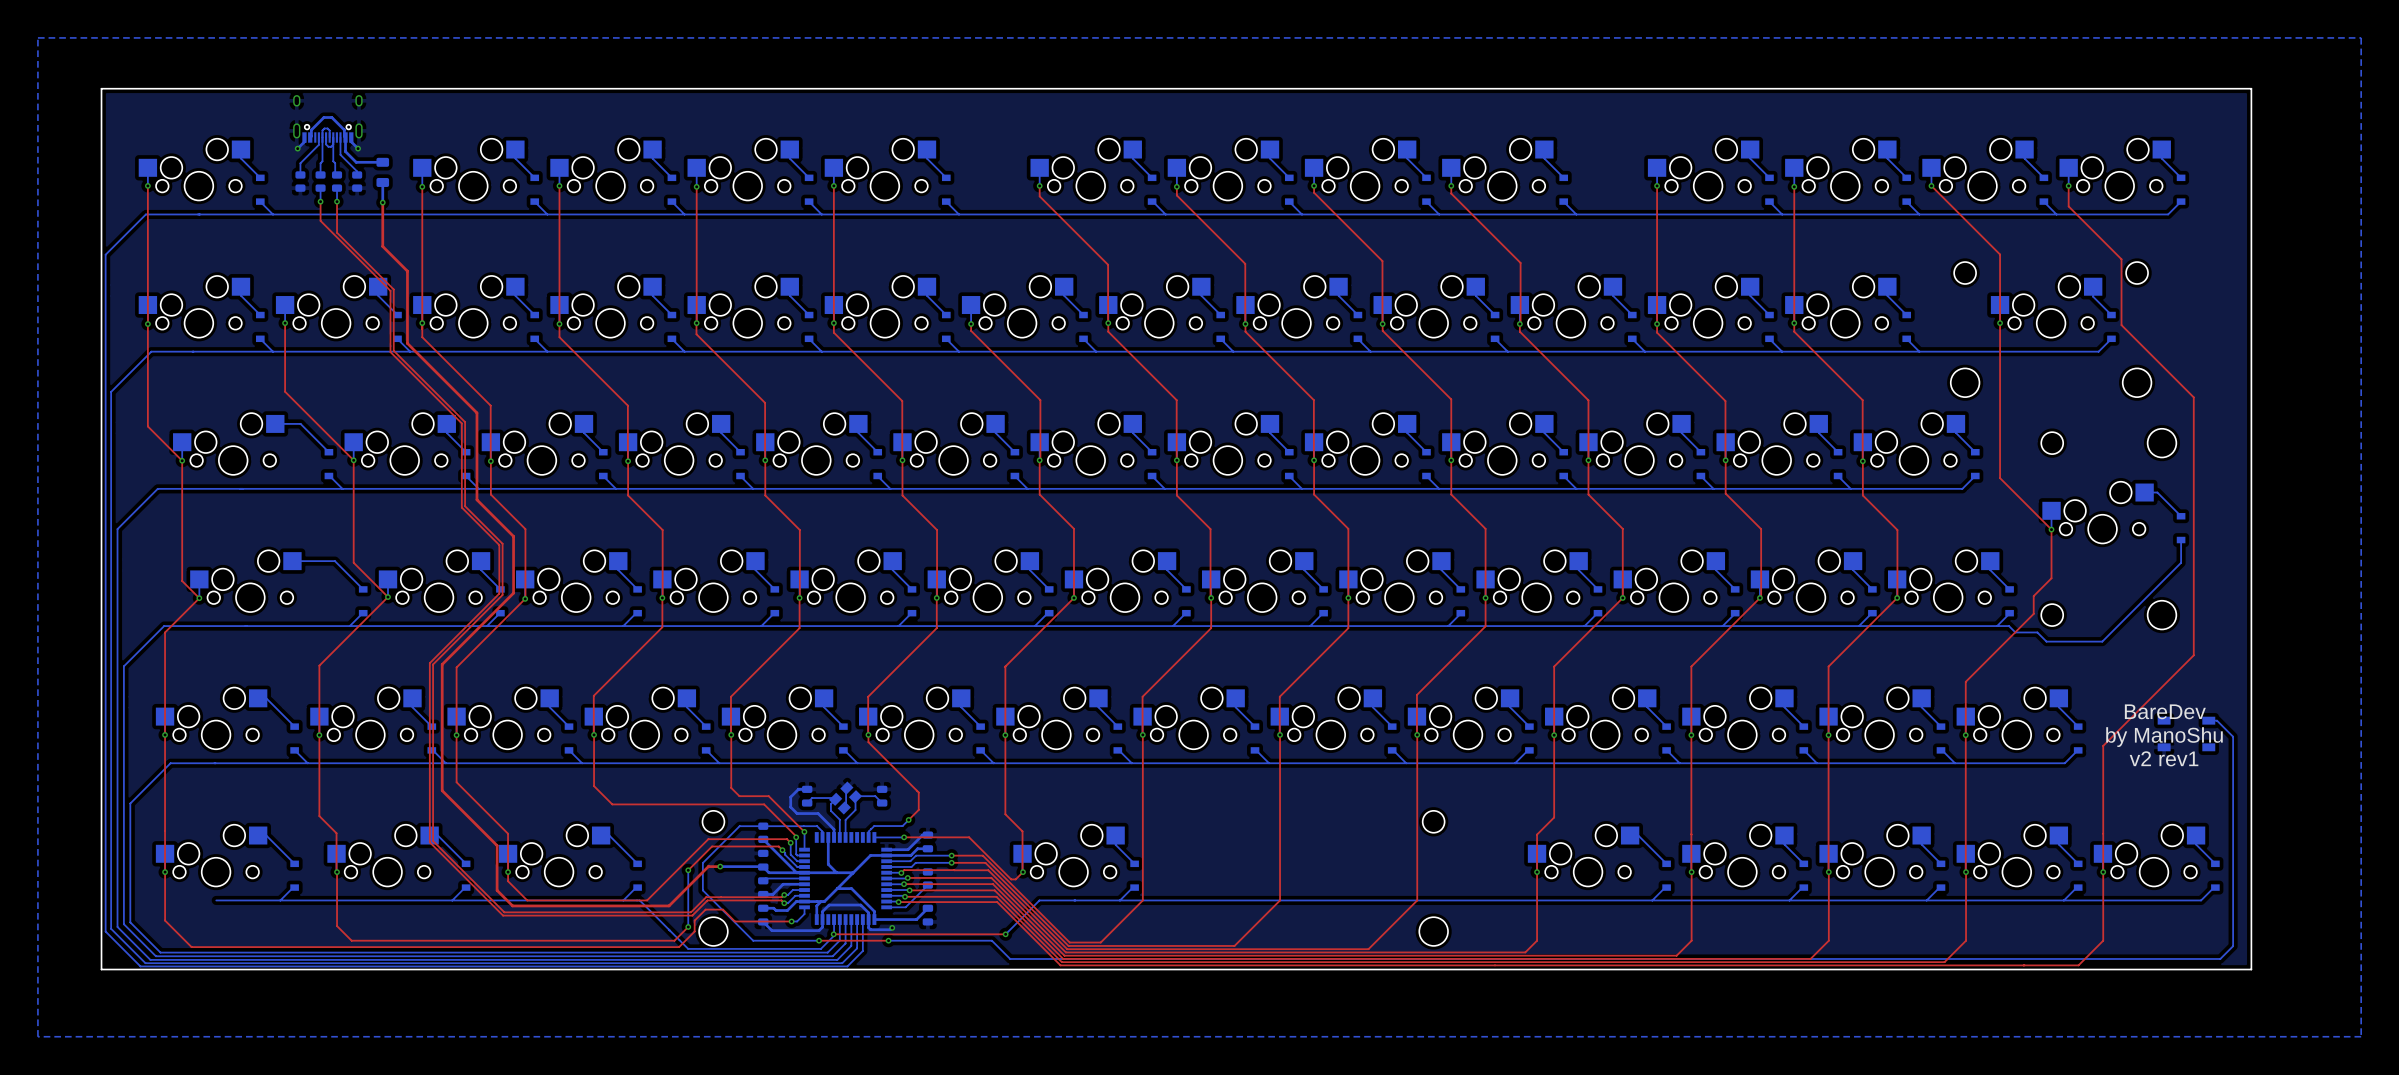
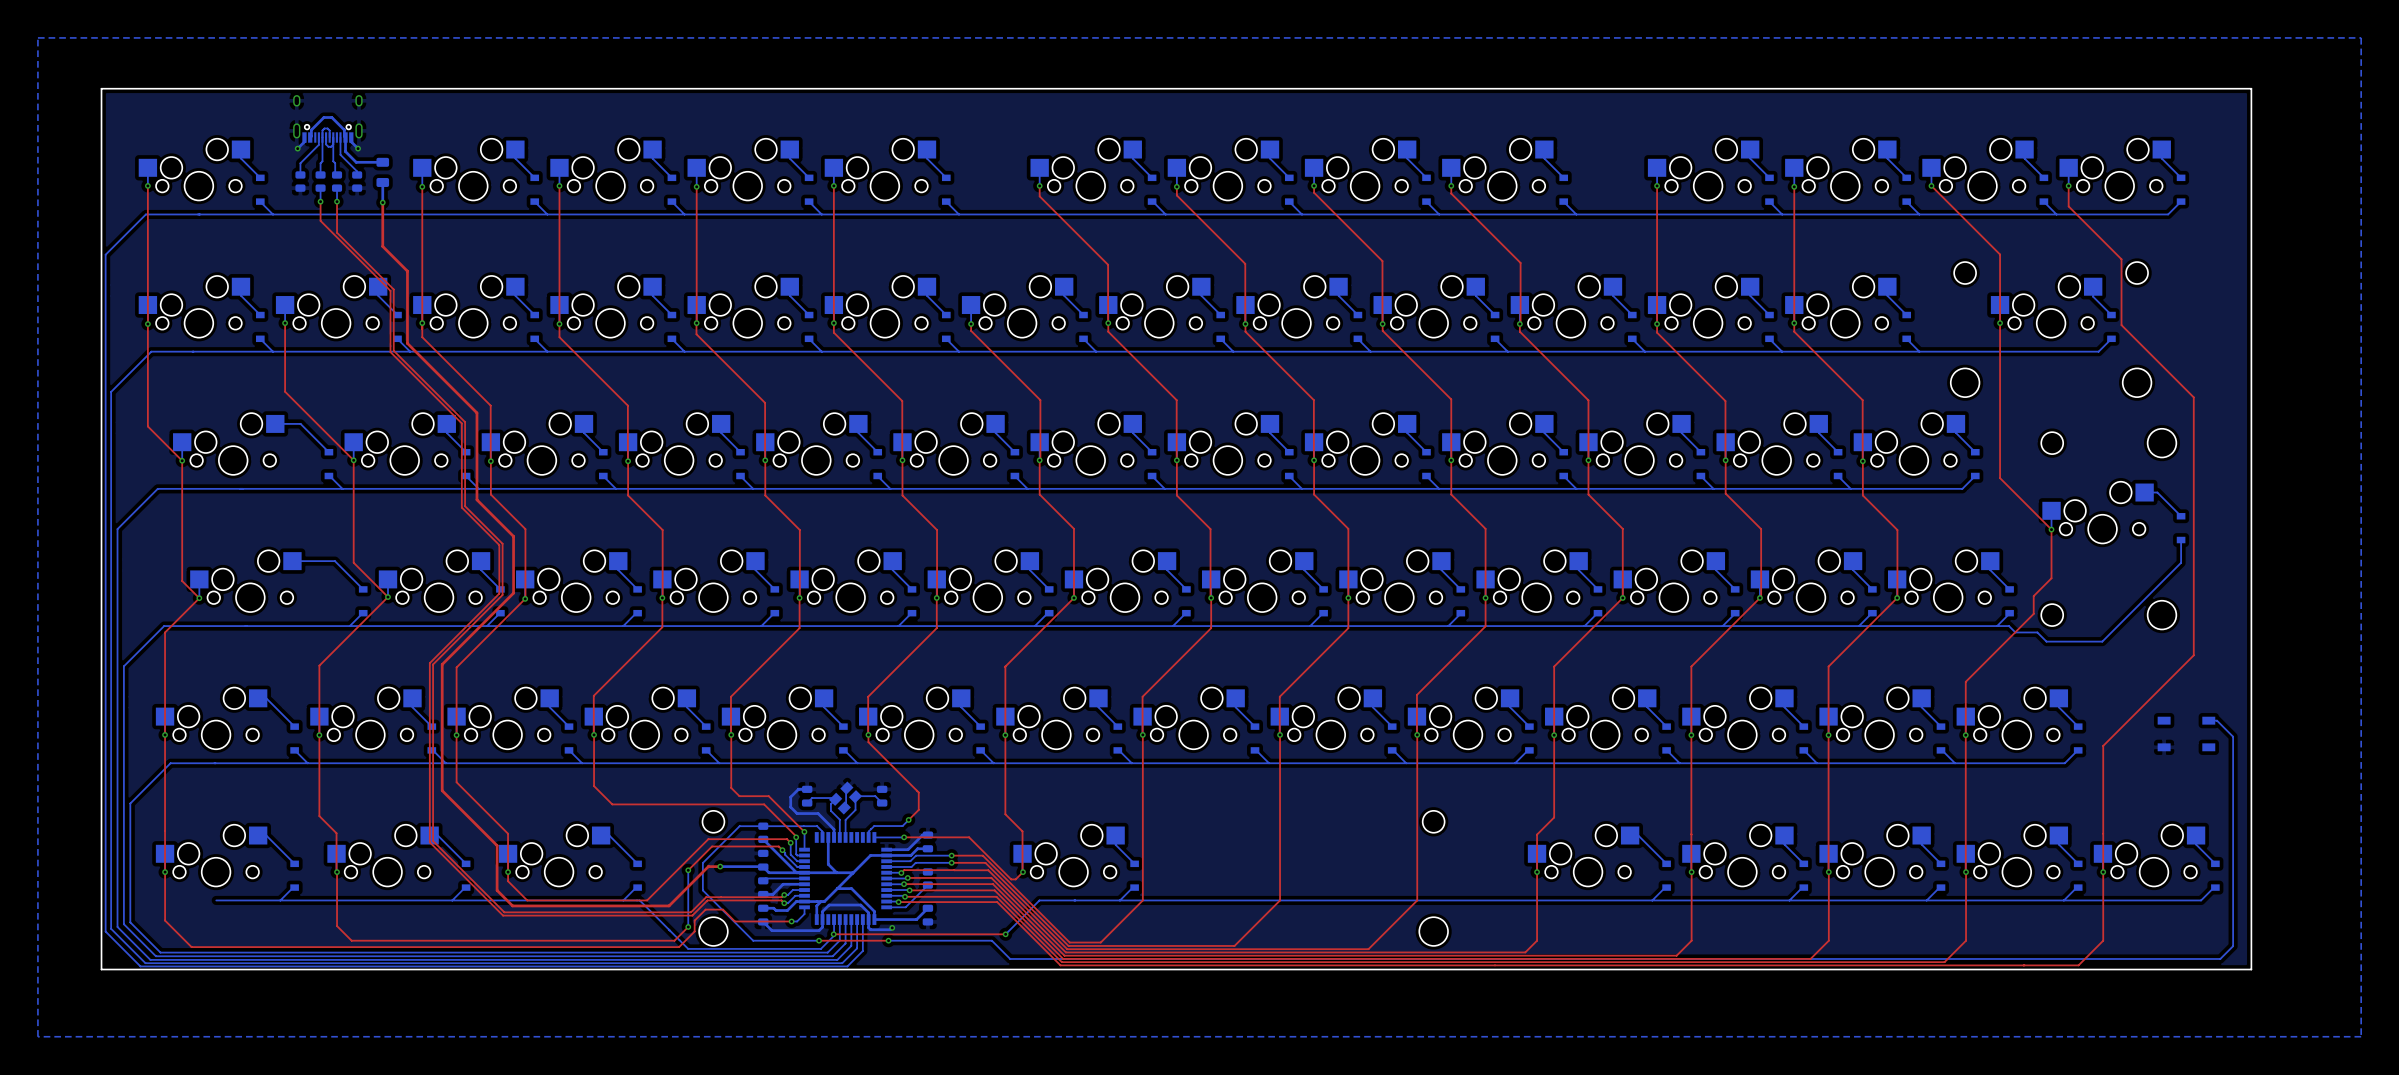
text: BareDev (2165, 711) -> none
text: by ManoShu (2164, 737) -> none
text: v2 rev1 (2164, 758) -> none

